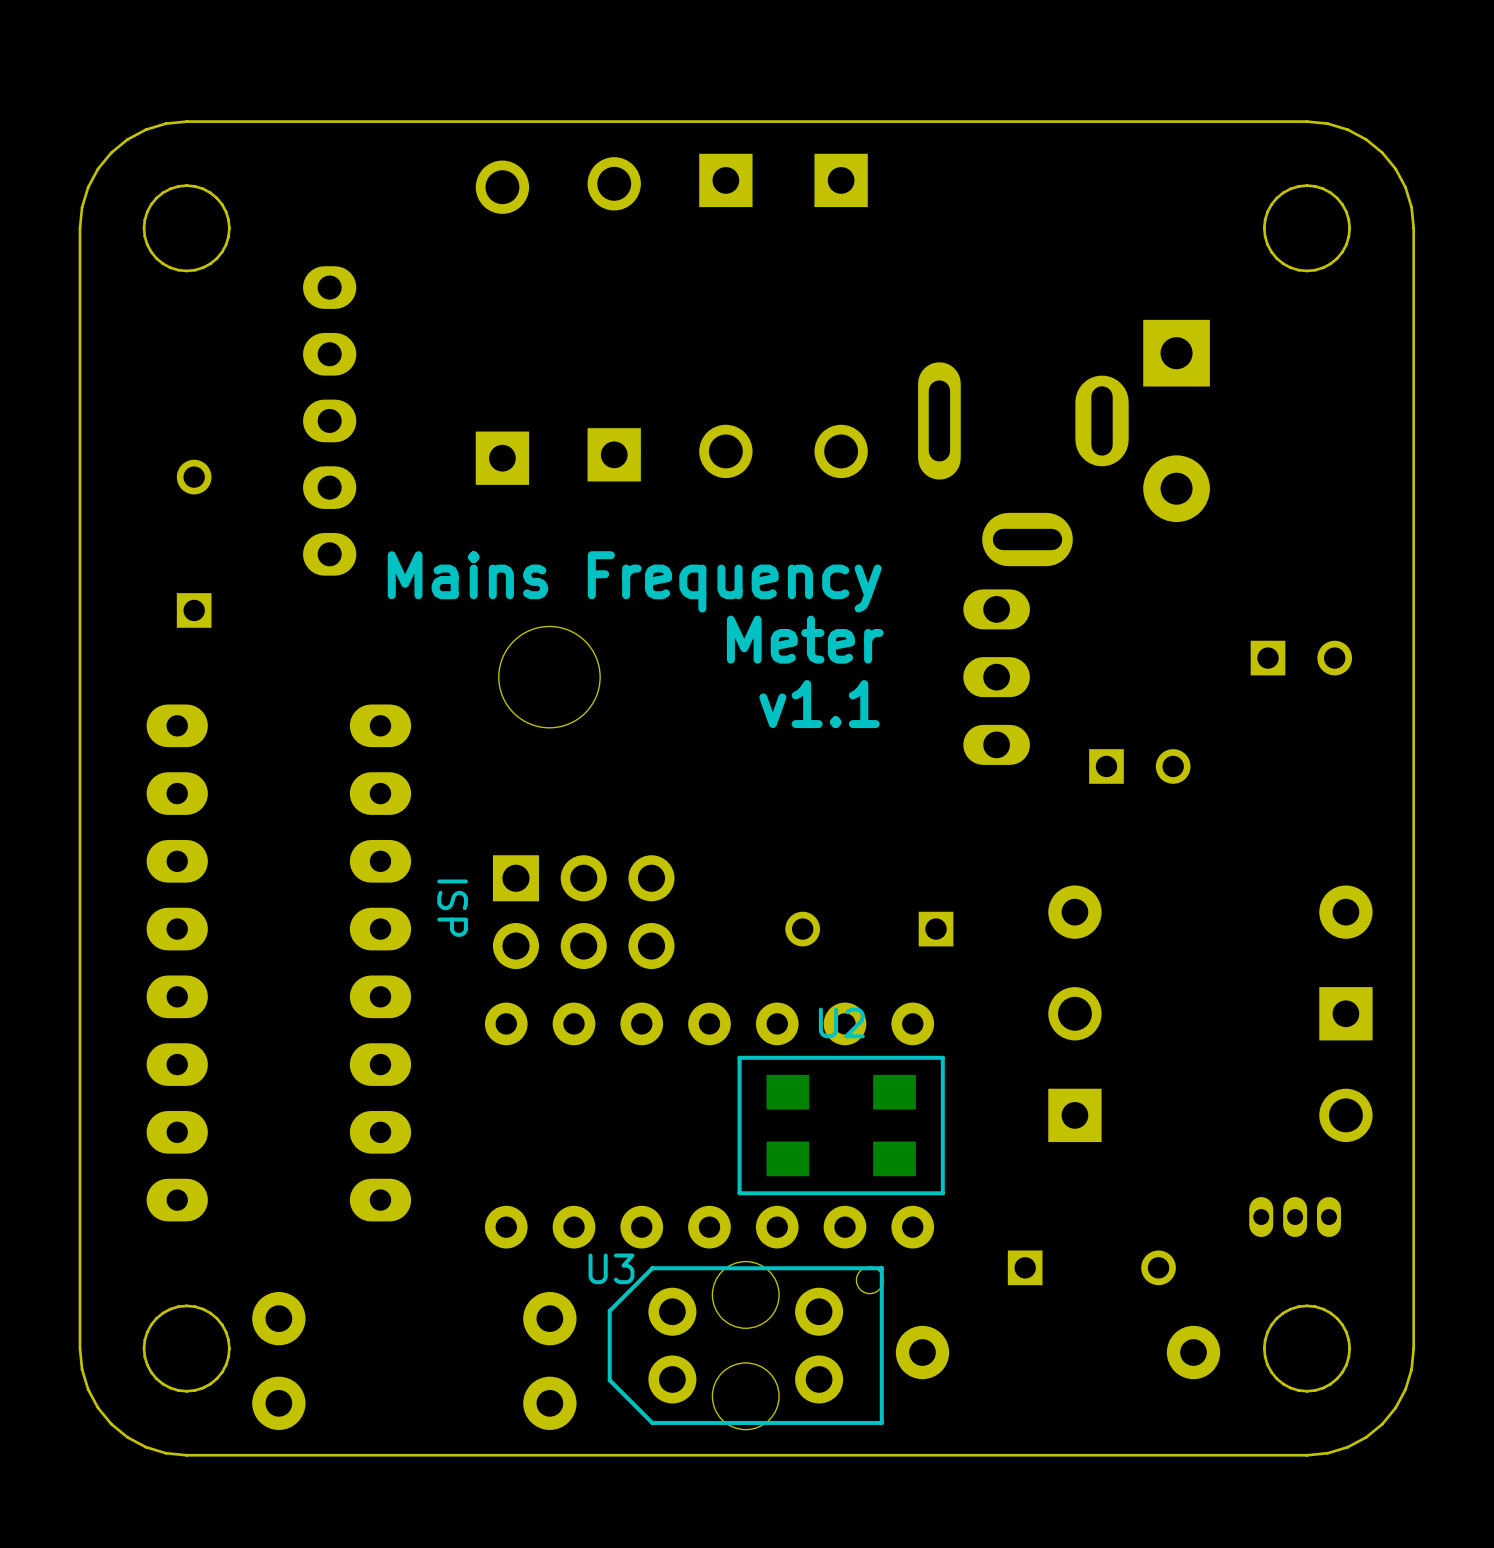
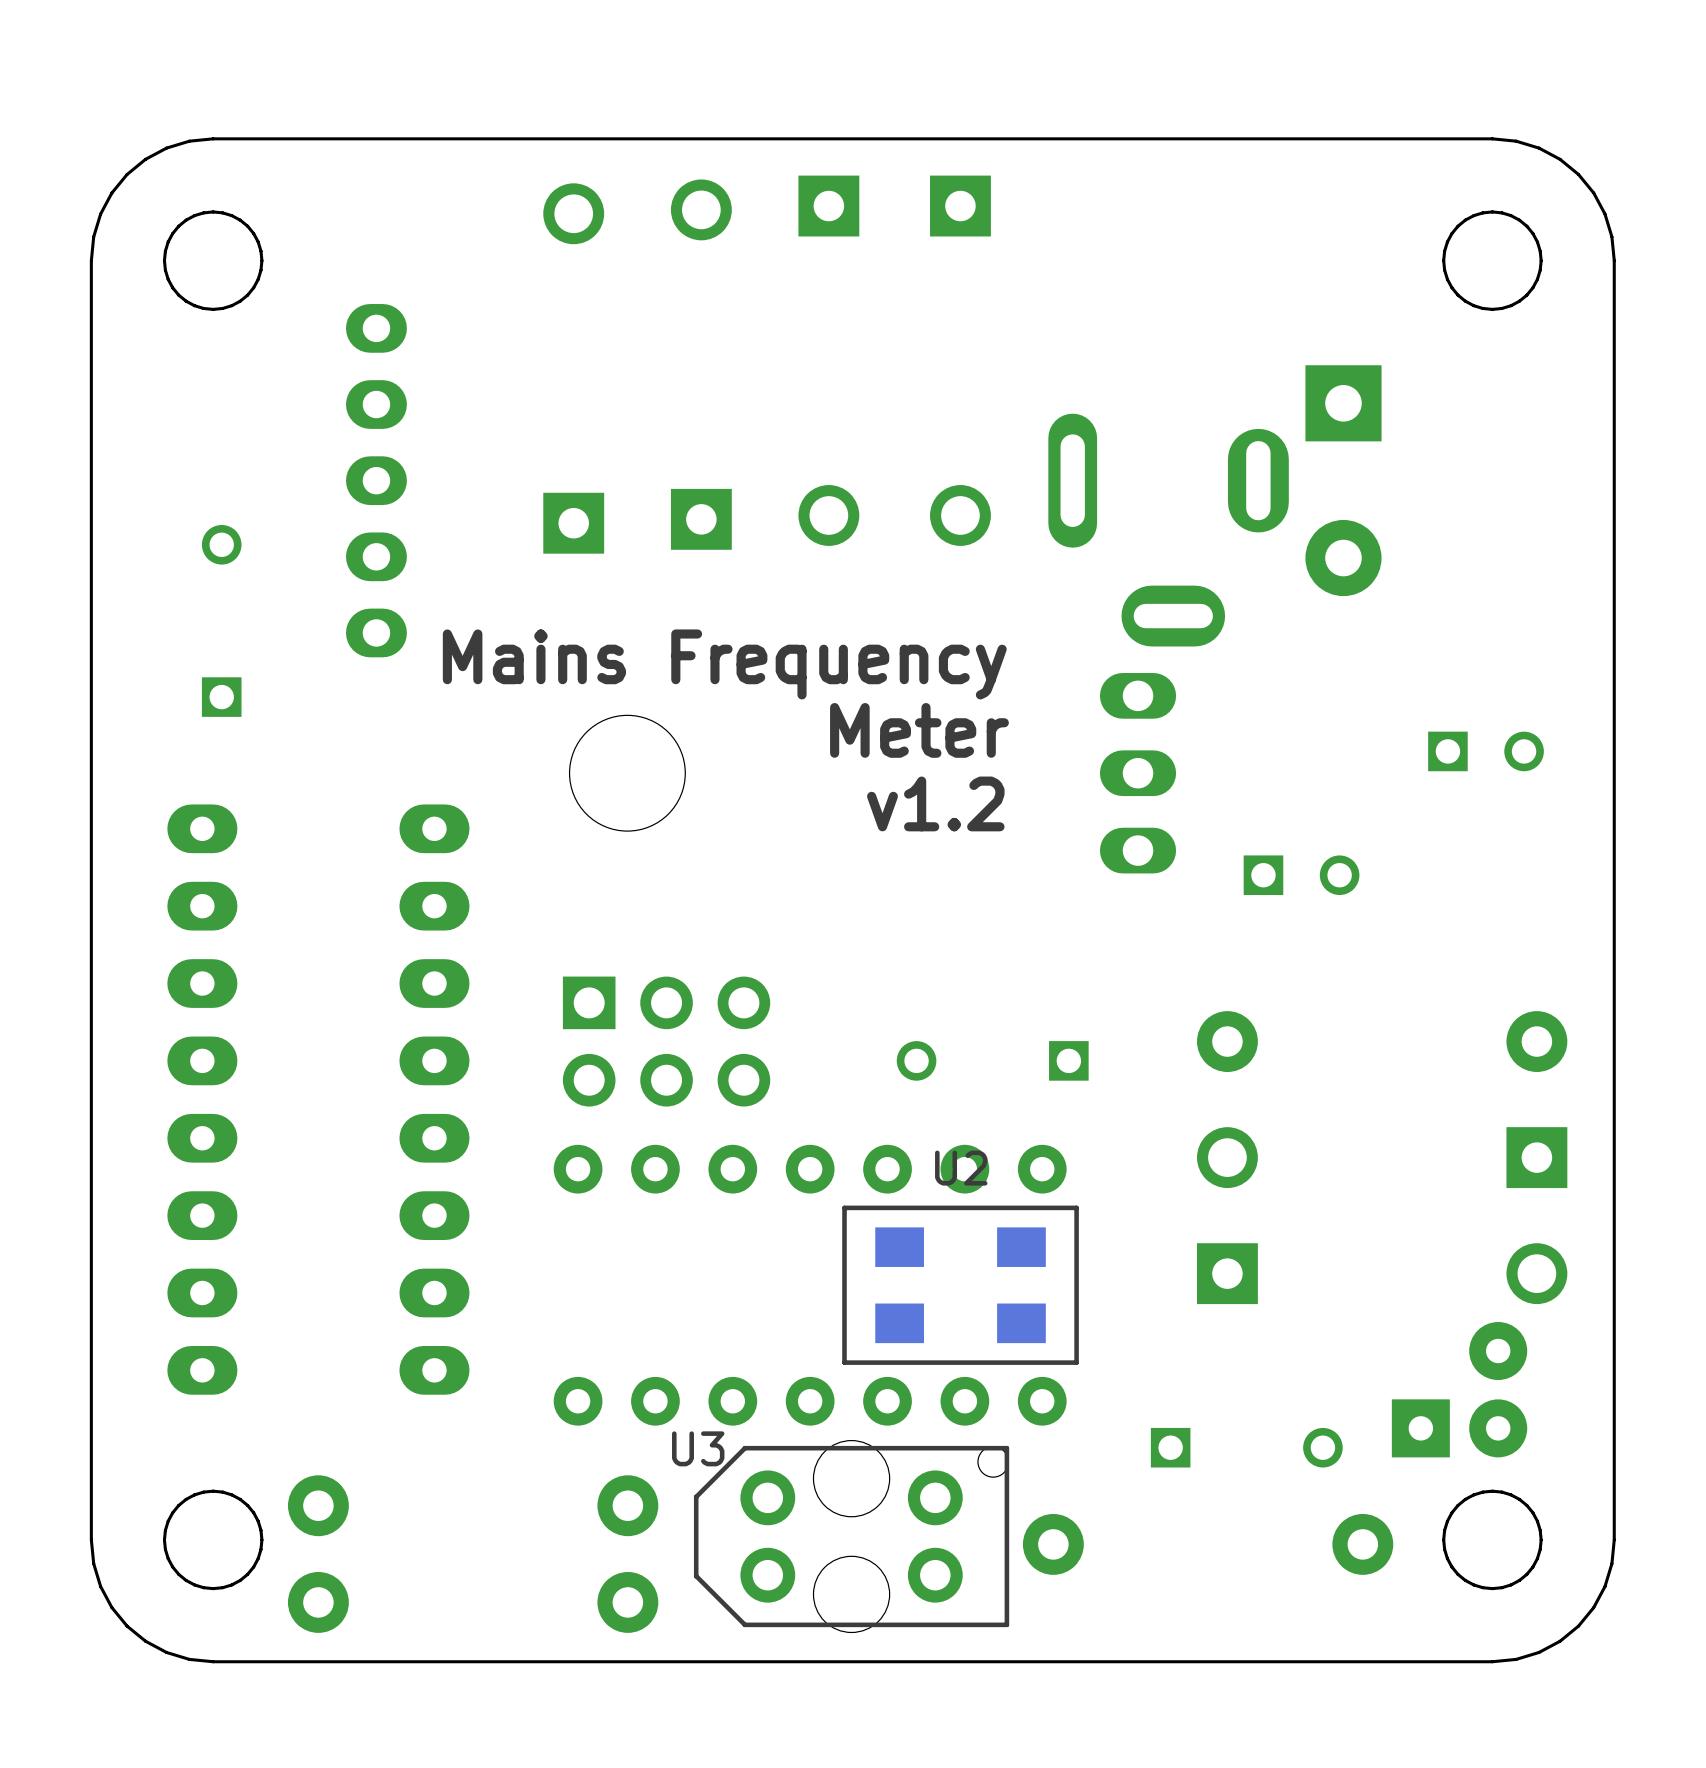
text: v1.1 (819, 704) -> v1.2 (935, 803)
text: ISP (452, 908) -> none
part footprint: [1249, 1196, 1341, 1238] -> [1391, 1321, 1528, 1458]

